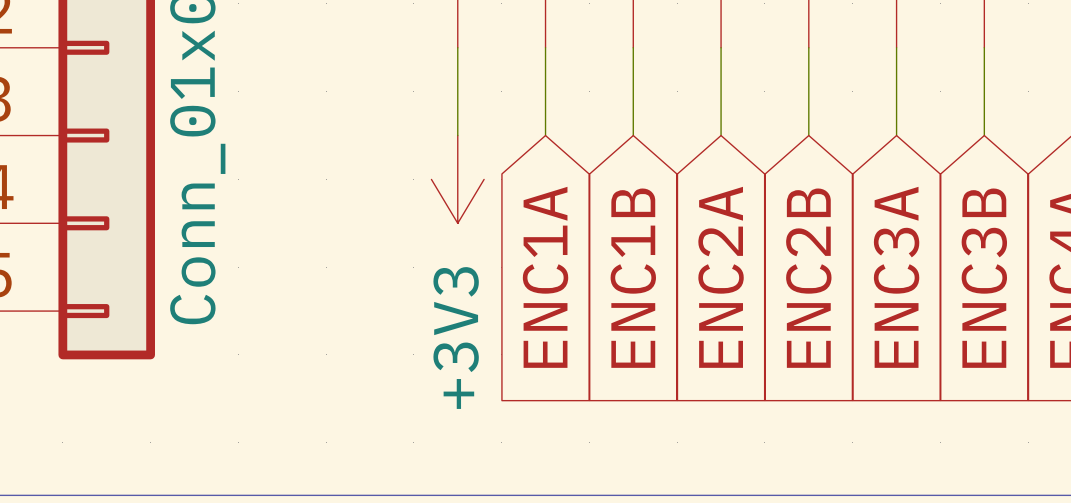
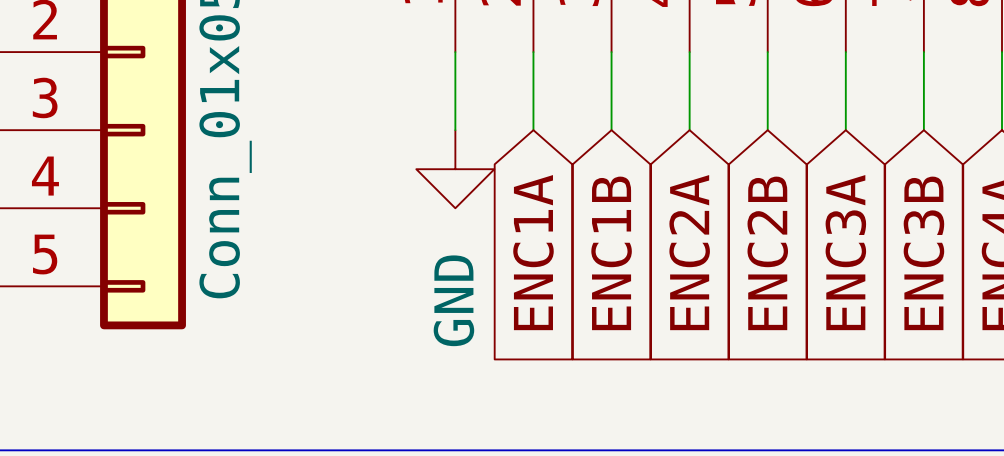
power symbol: +3V3 (457, 179) -> GND (455, 169)

